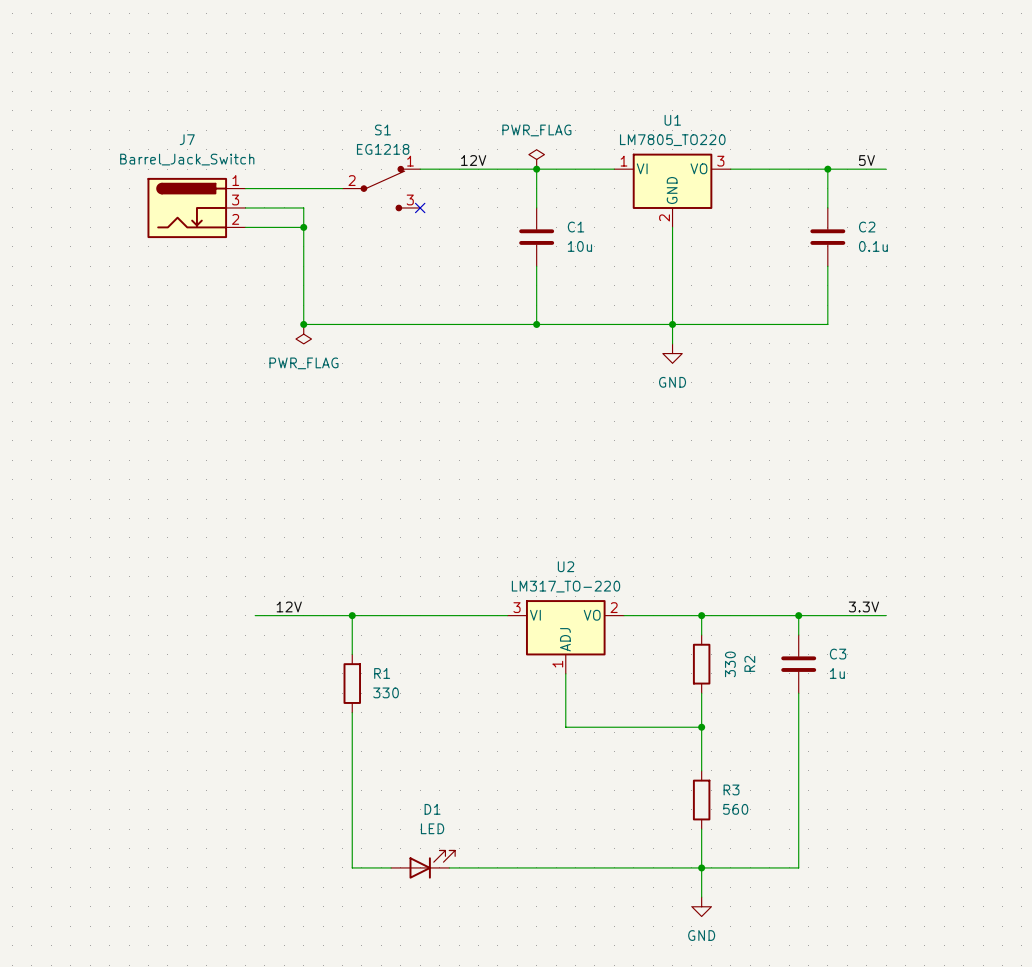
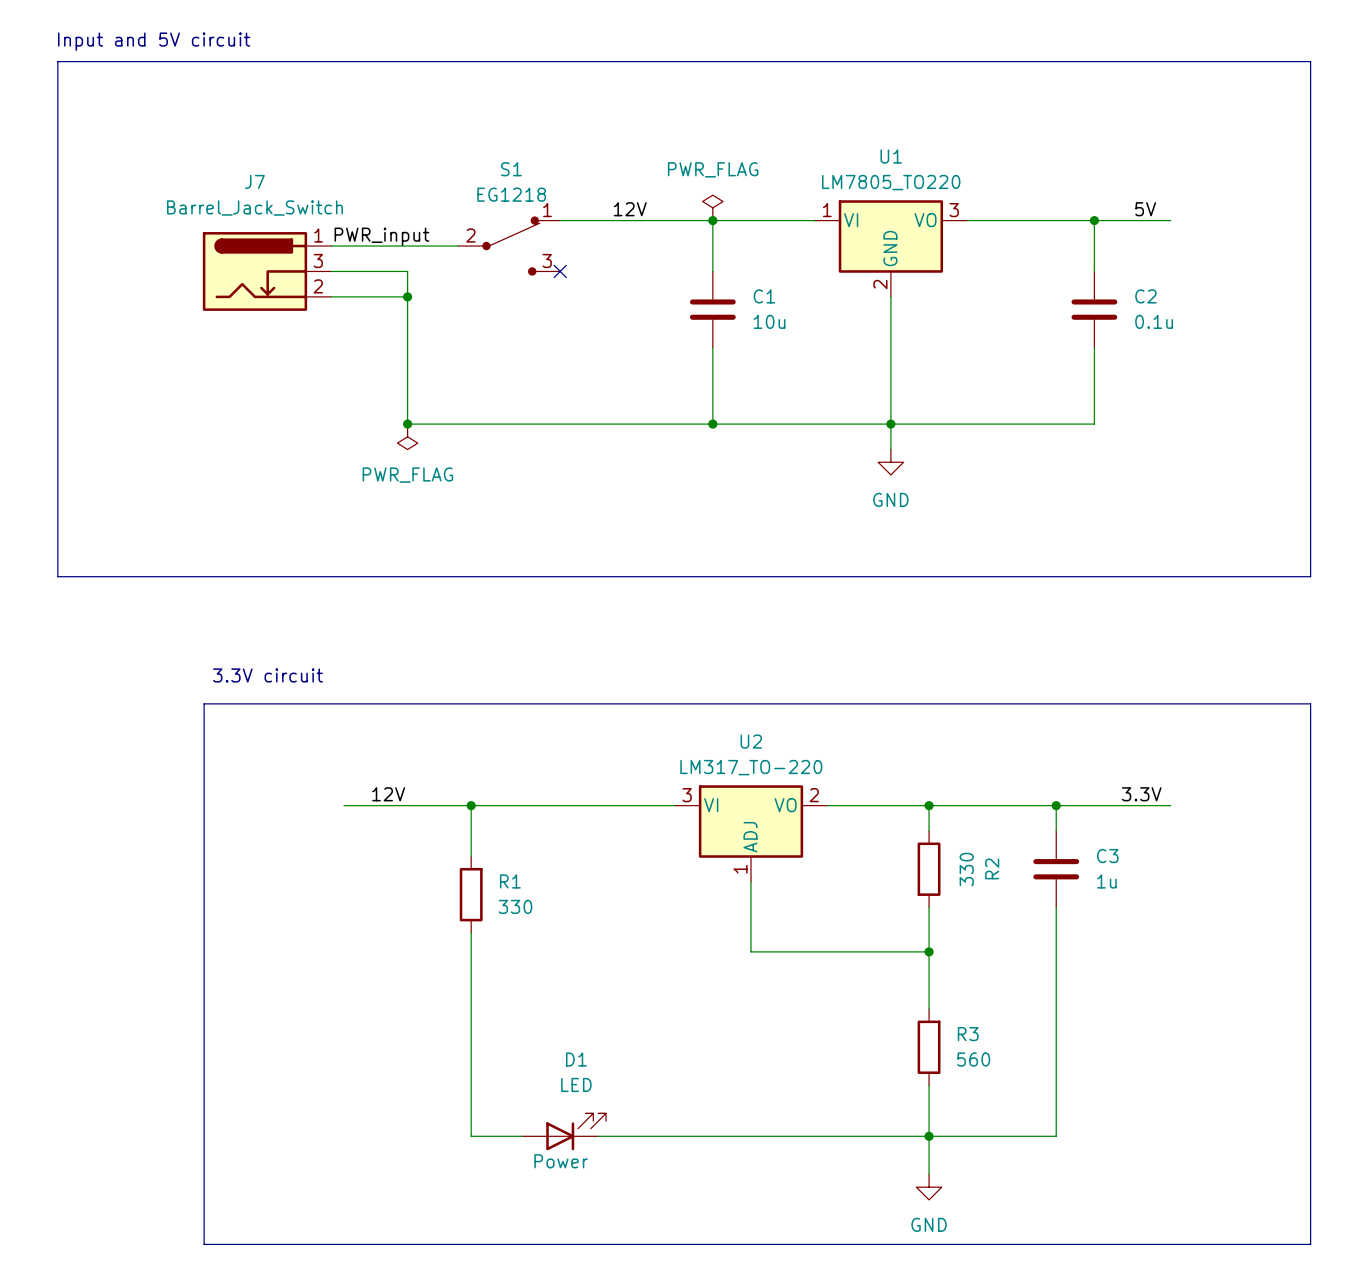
text: none -> Input and 5V circuit (154, 41)
line: none -> (57, 61) (1310, 61) (1310, 576) (57, 576) (57, 61)
label: none -> PWR_input (381, 236)
text: none -> 3.3V circuit (268, 675)
line: none -> (204, 703) (1310, 703) (1310, 1244) (204, 1244) (204, 703)
D1 text: none -> Power (561, 1161)

